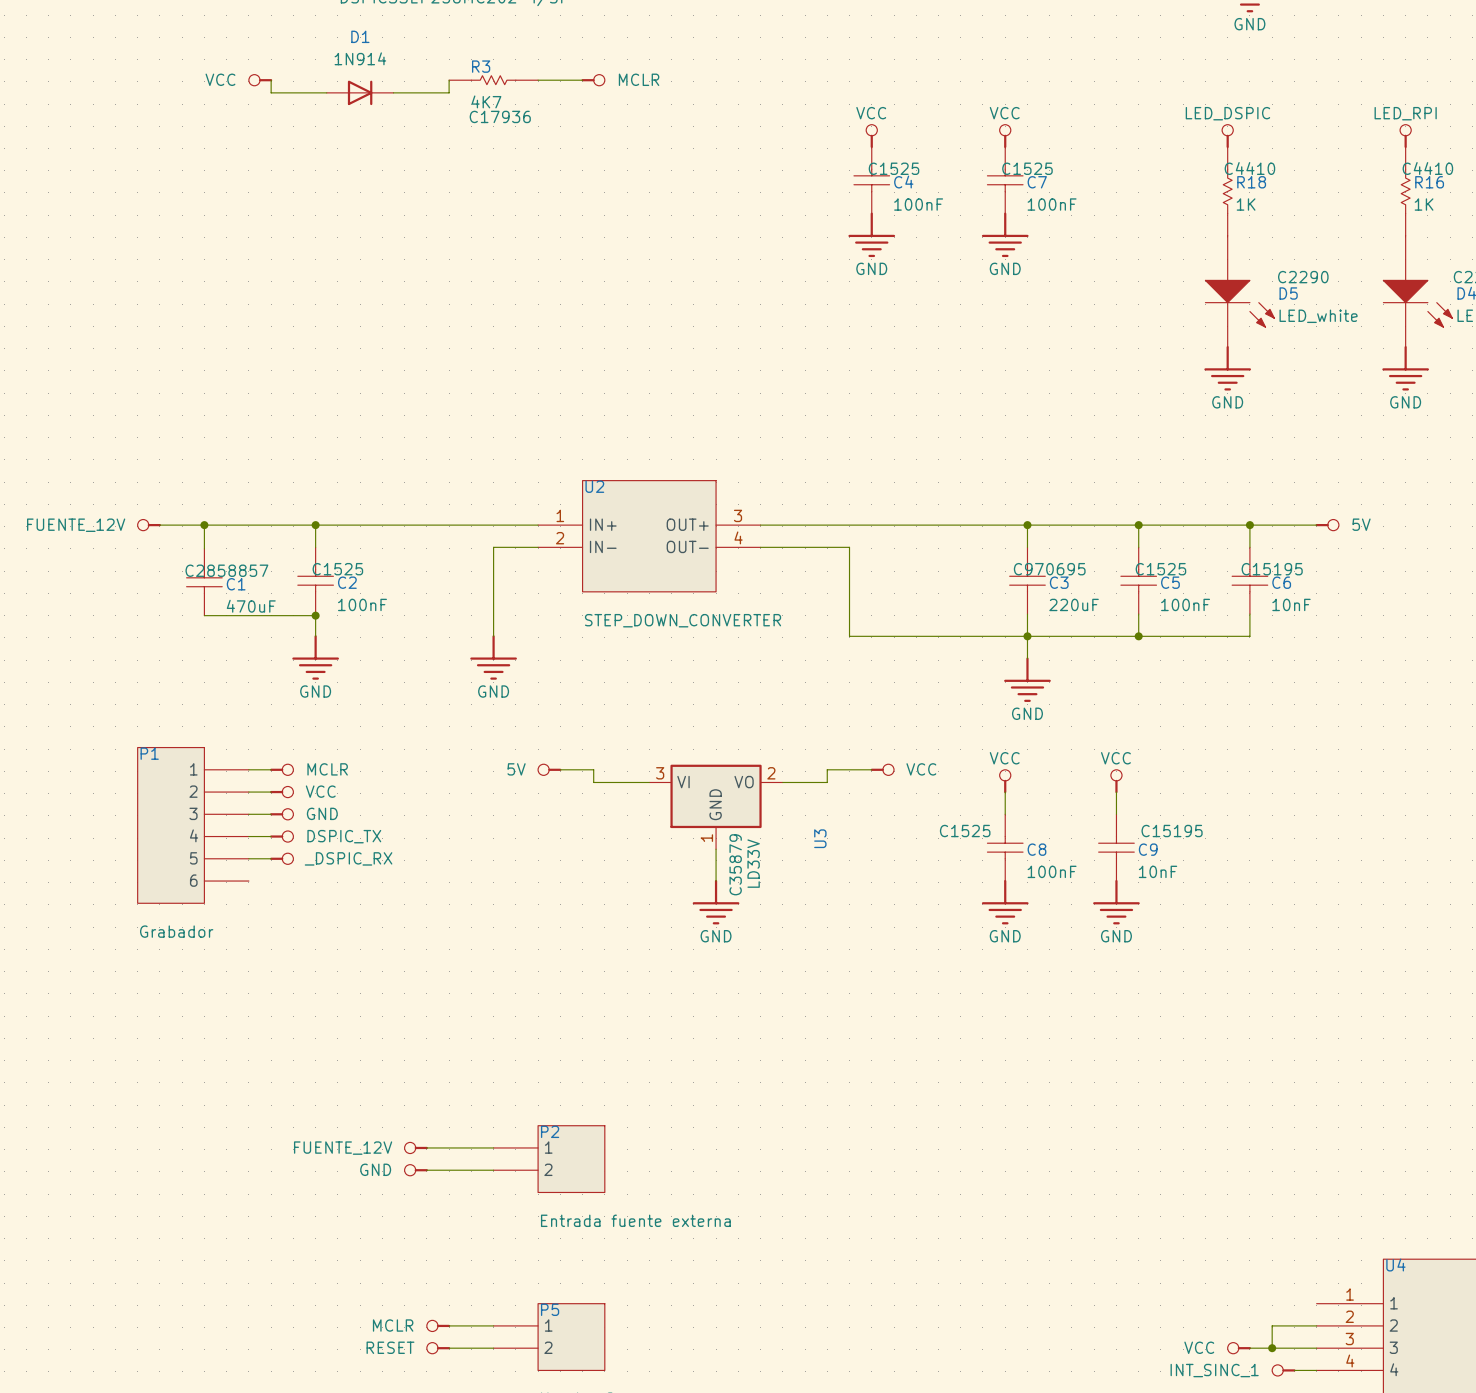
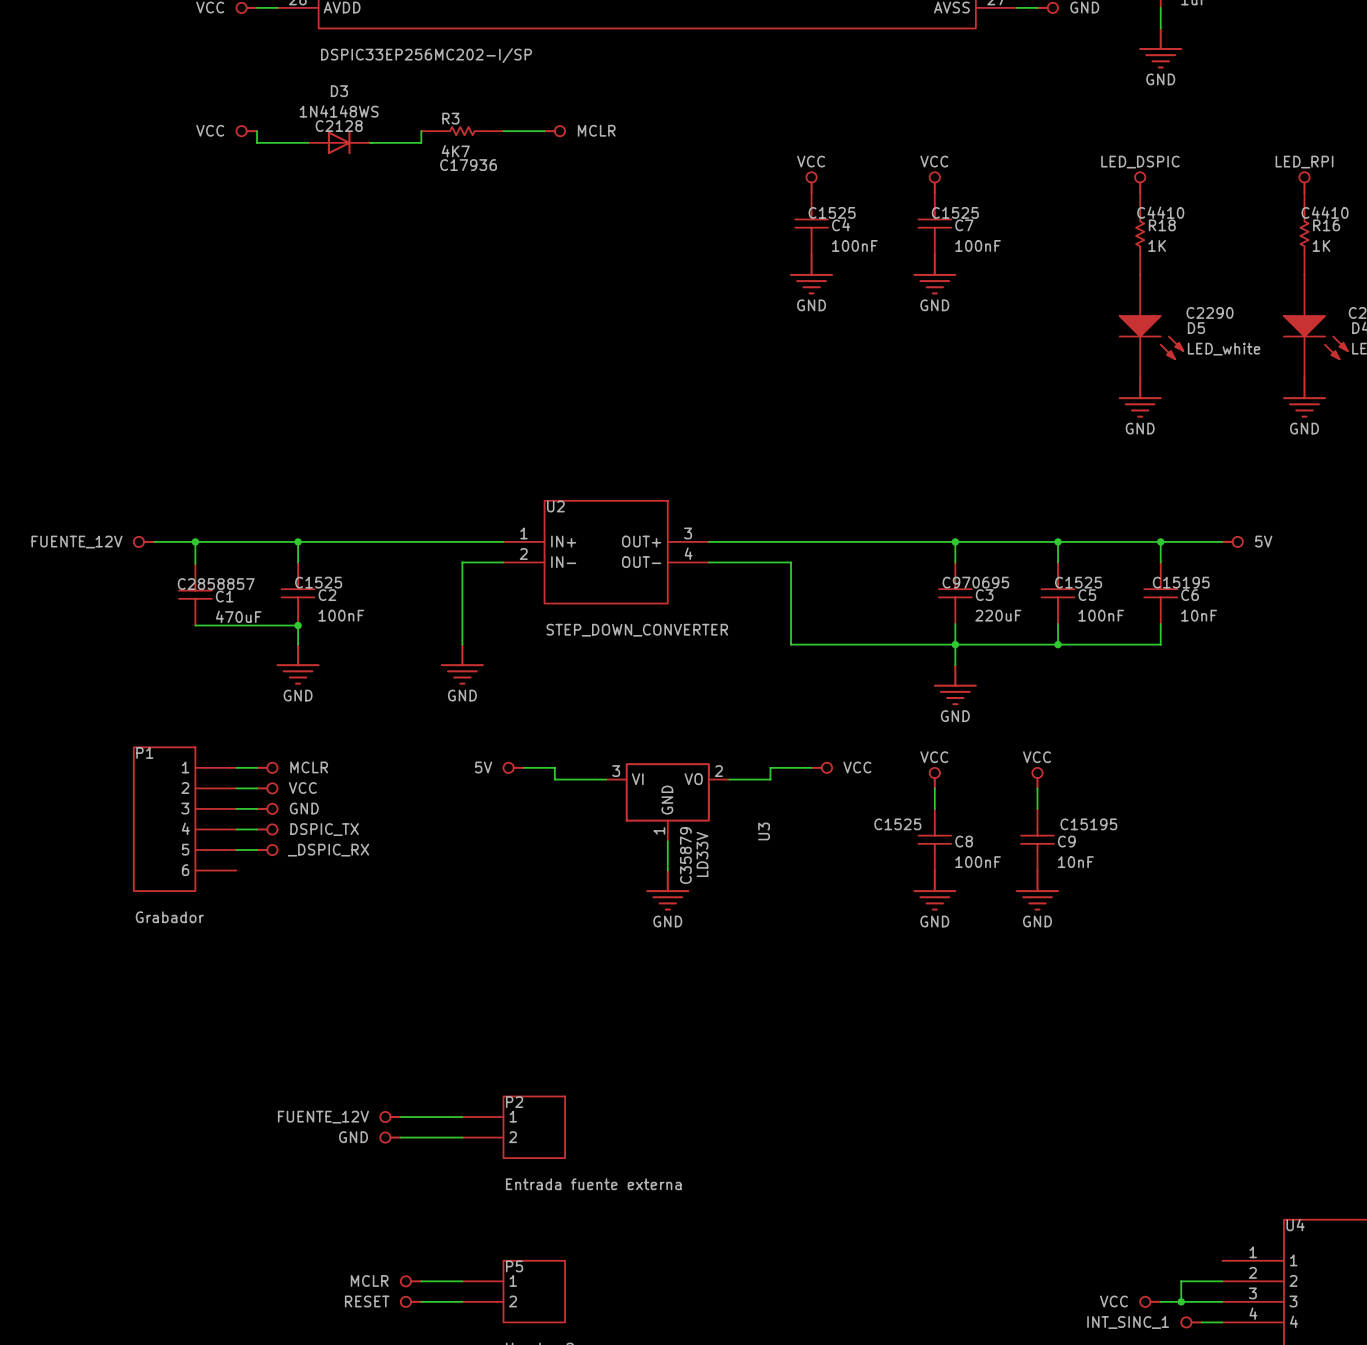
D1 name: D1 (360, 36) -> D3 (339, 91)
D1 value: 1N914 (360, 58) -> 1N4148WS (339, 111)
D1 text: none -> C2128 (339, 126)

